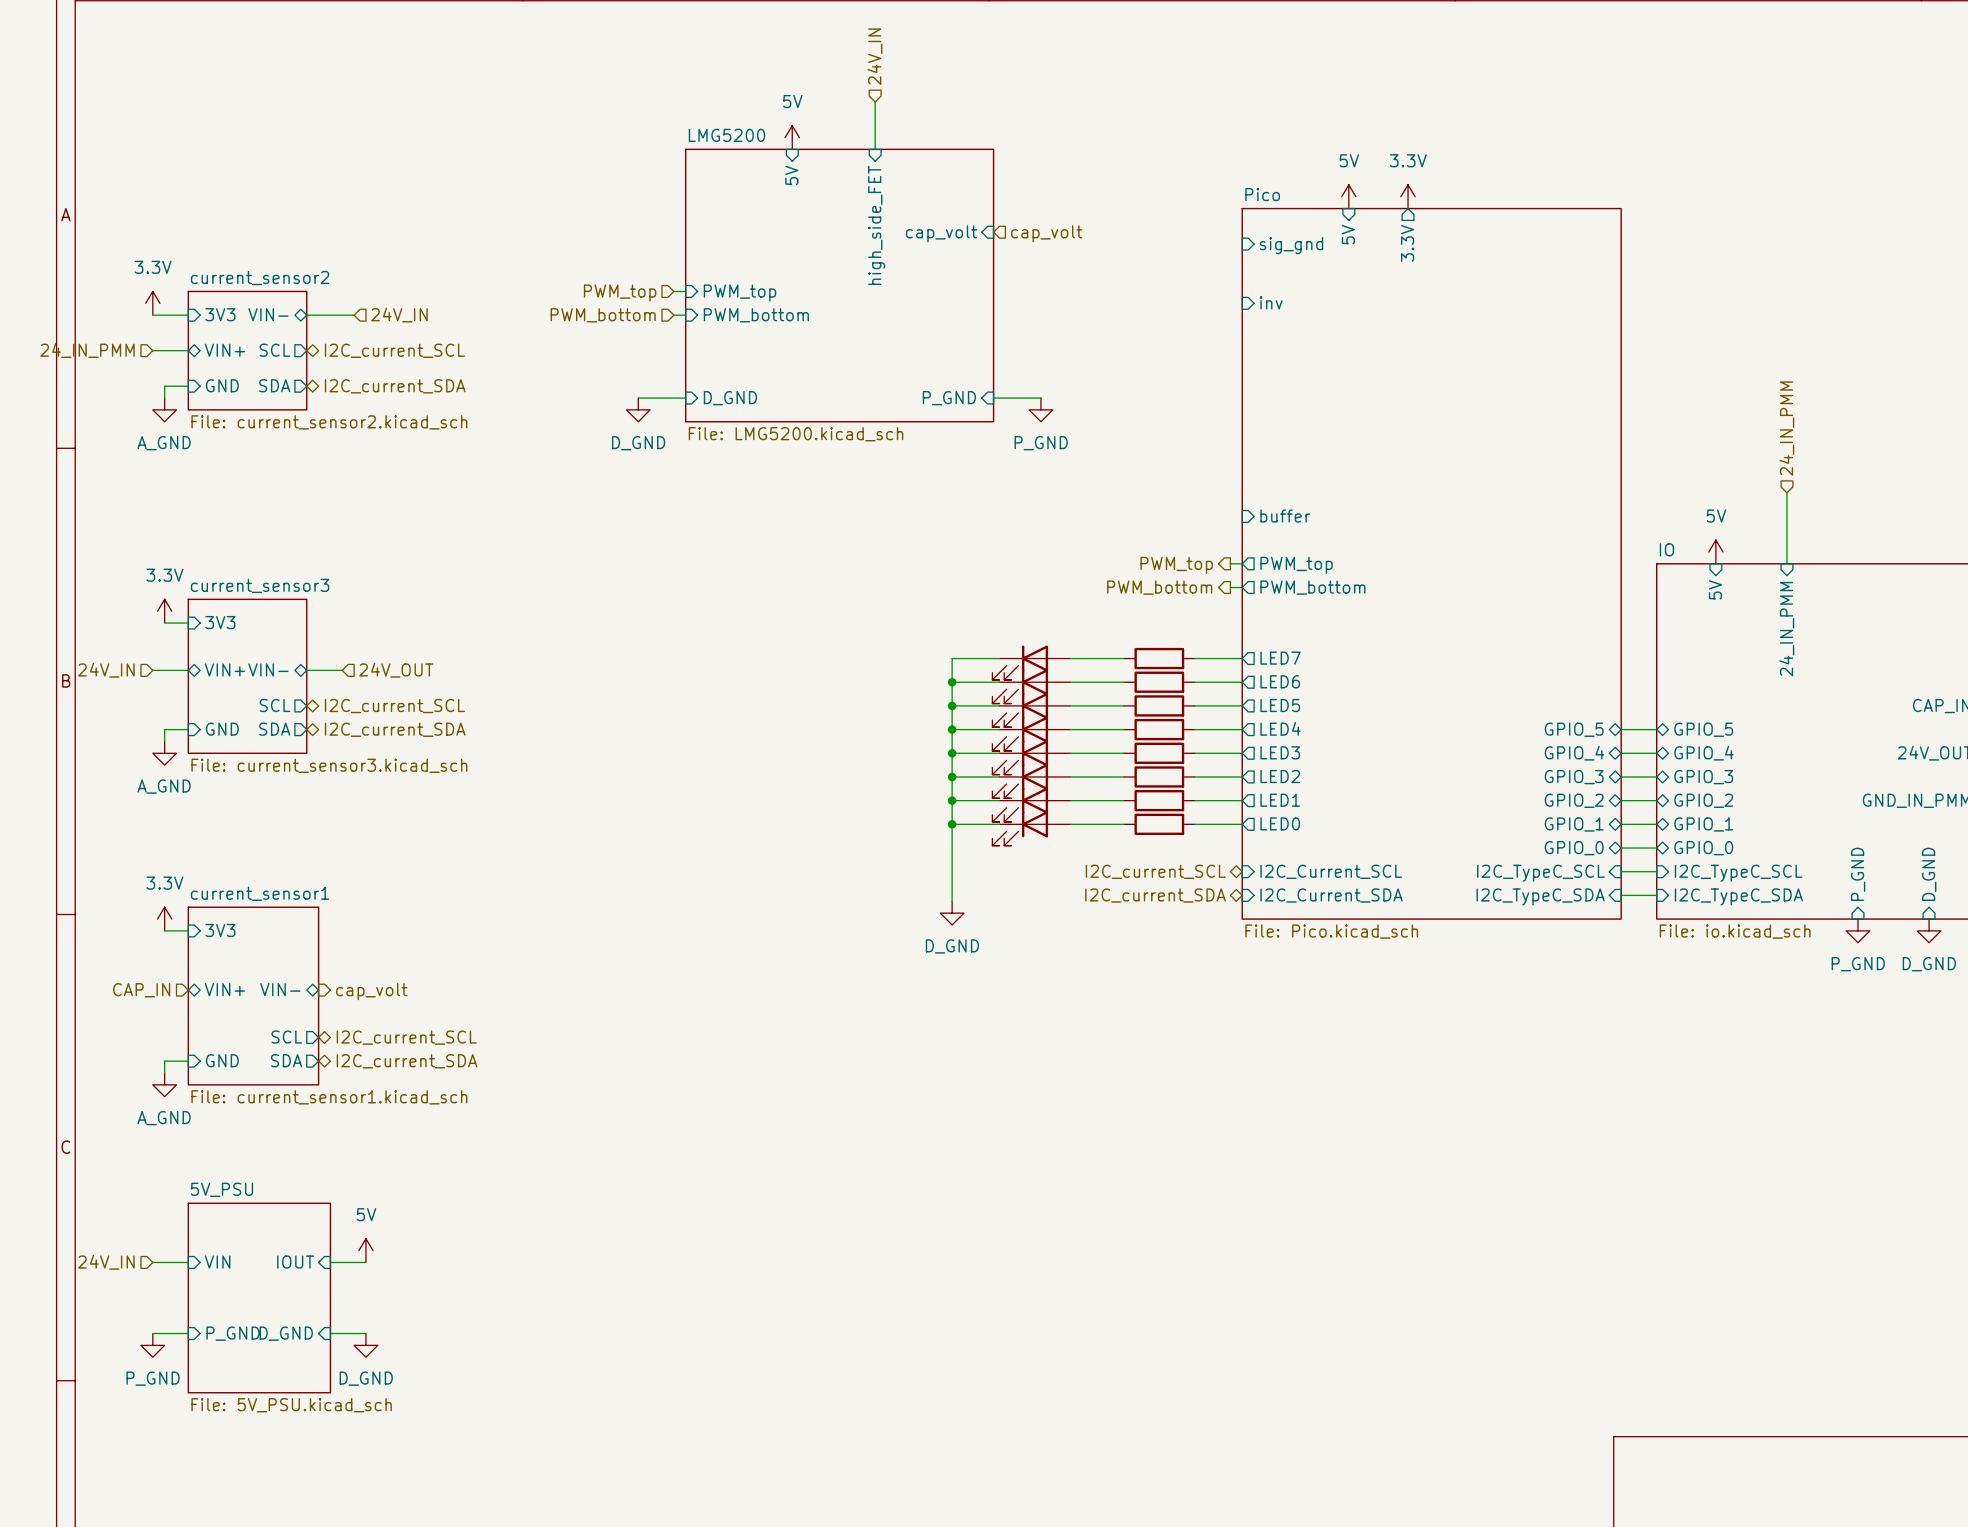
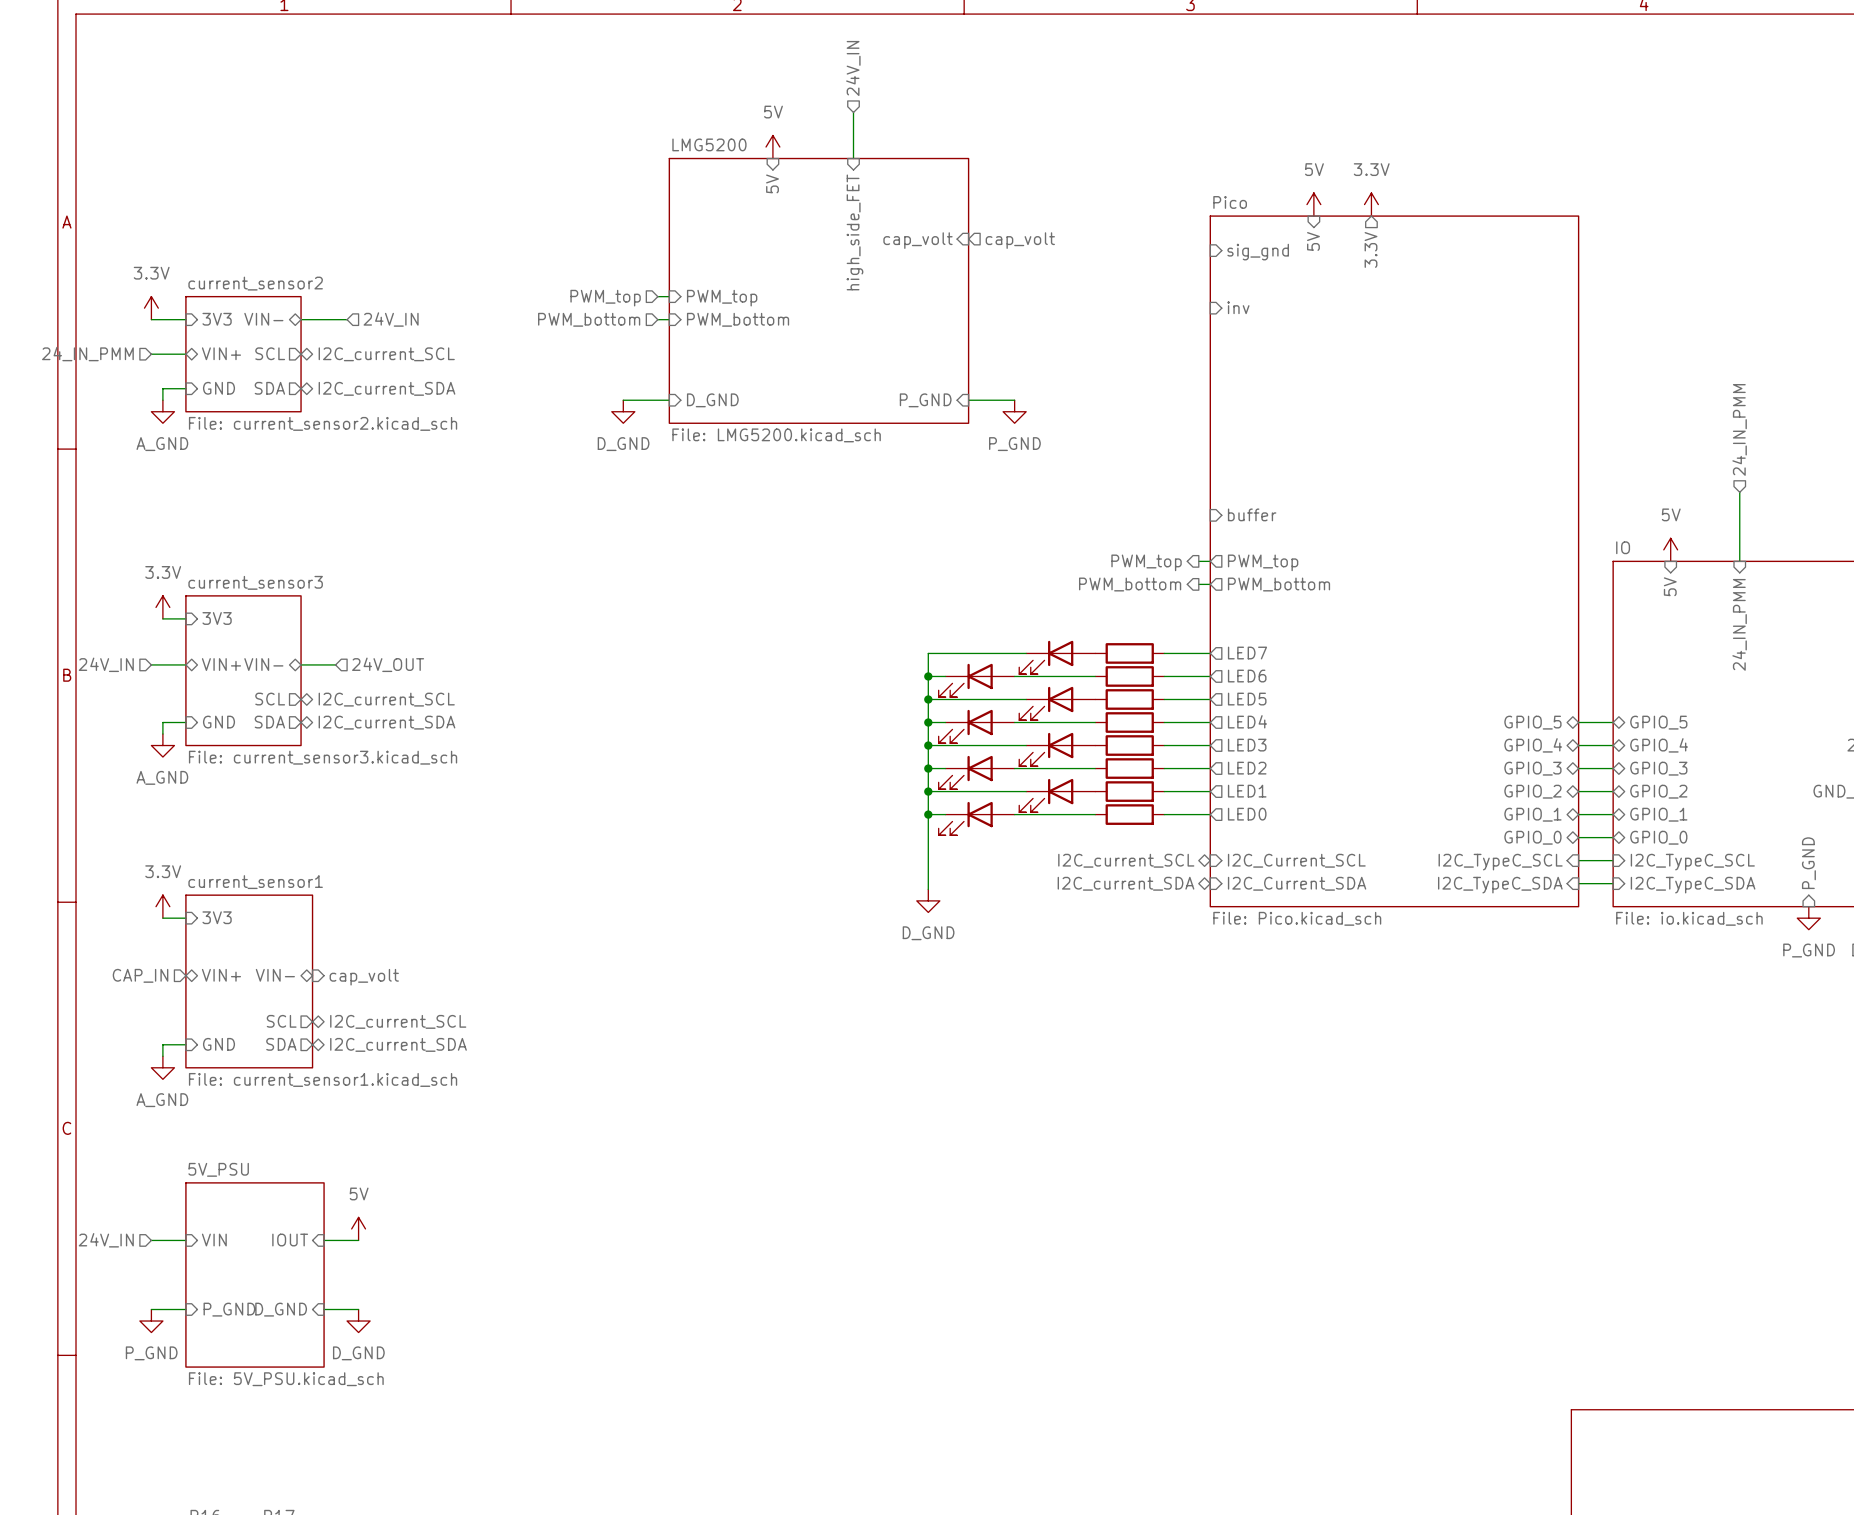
part: (1031, 662) -> none
part: none -> (1057, 657)
part: none -> (976, 680)
part: (1031, 686) -> none
part: (1031, 710) -> none
part: none -> (1057, 703)
part: none -> (976, 726)
part: (1031, 733) -> none
part: (1031, 757) -> none
part: none -> (1057, 749)
part: none -> (976, 772)
part: (1031, 781) -> none
part: (1031, 804) -> none
part: none -> (1057, 795)
part: none -> (976, 818)
part: (1031, 828) -> none

